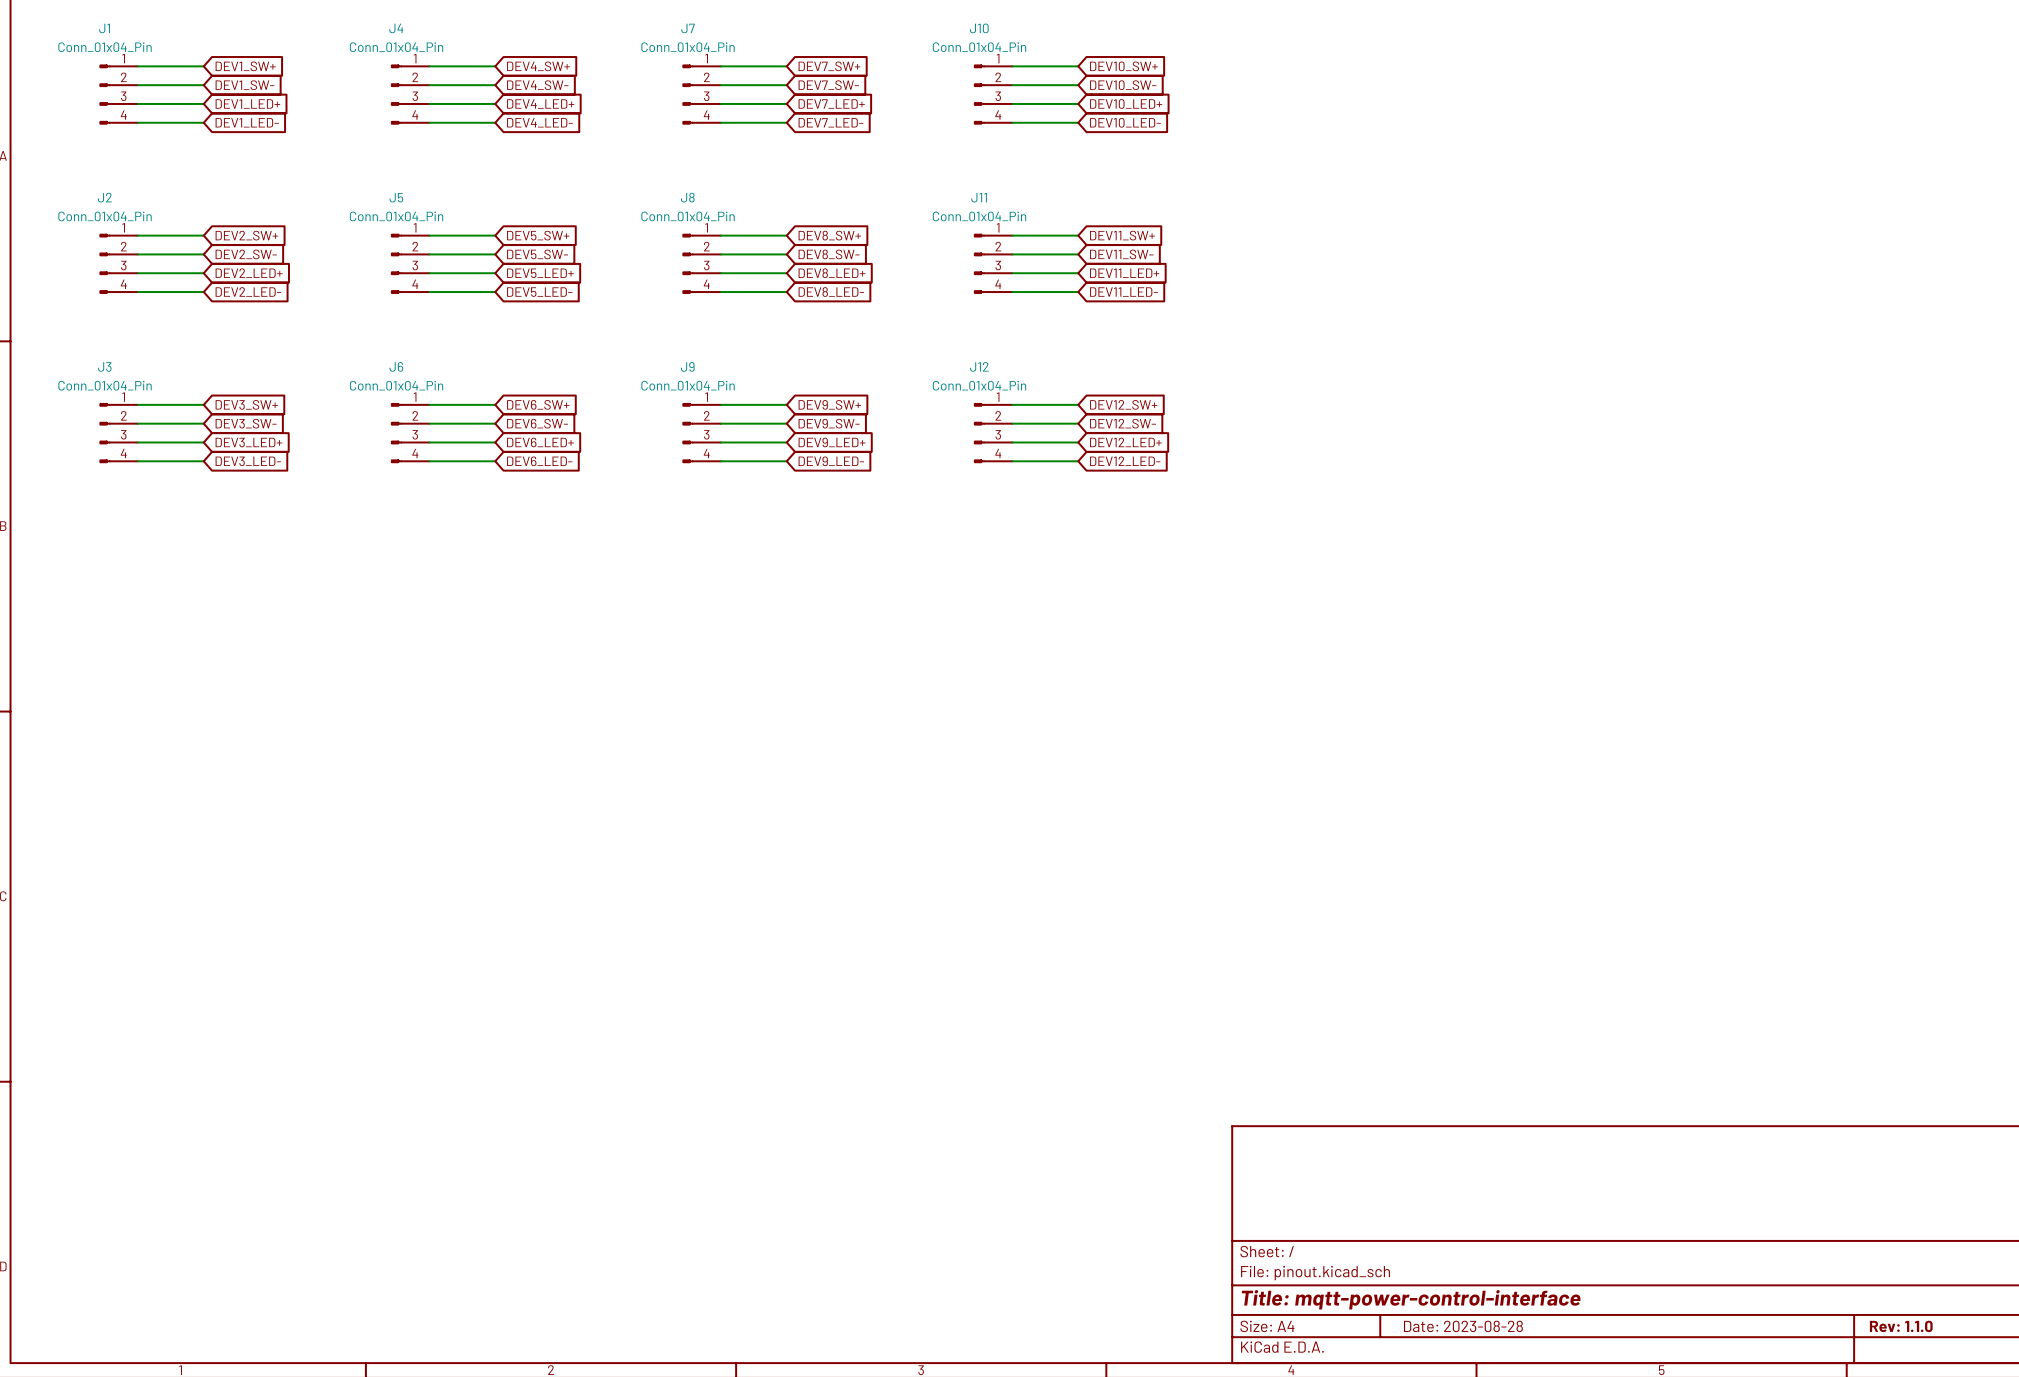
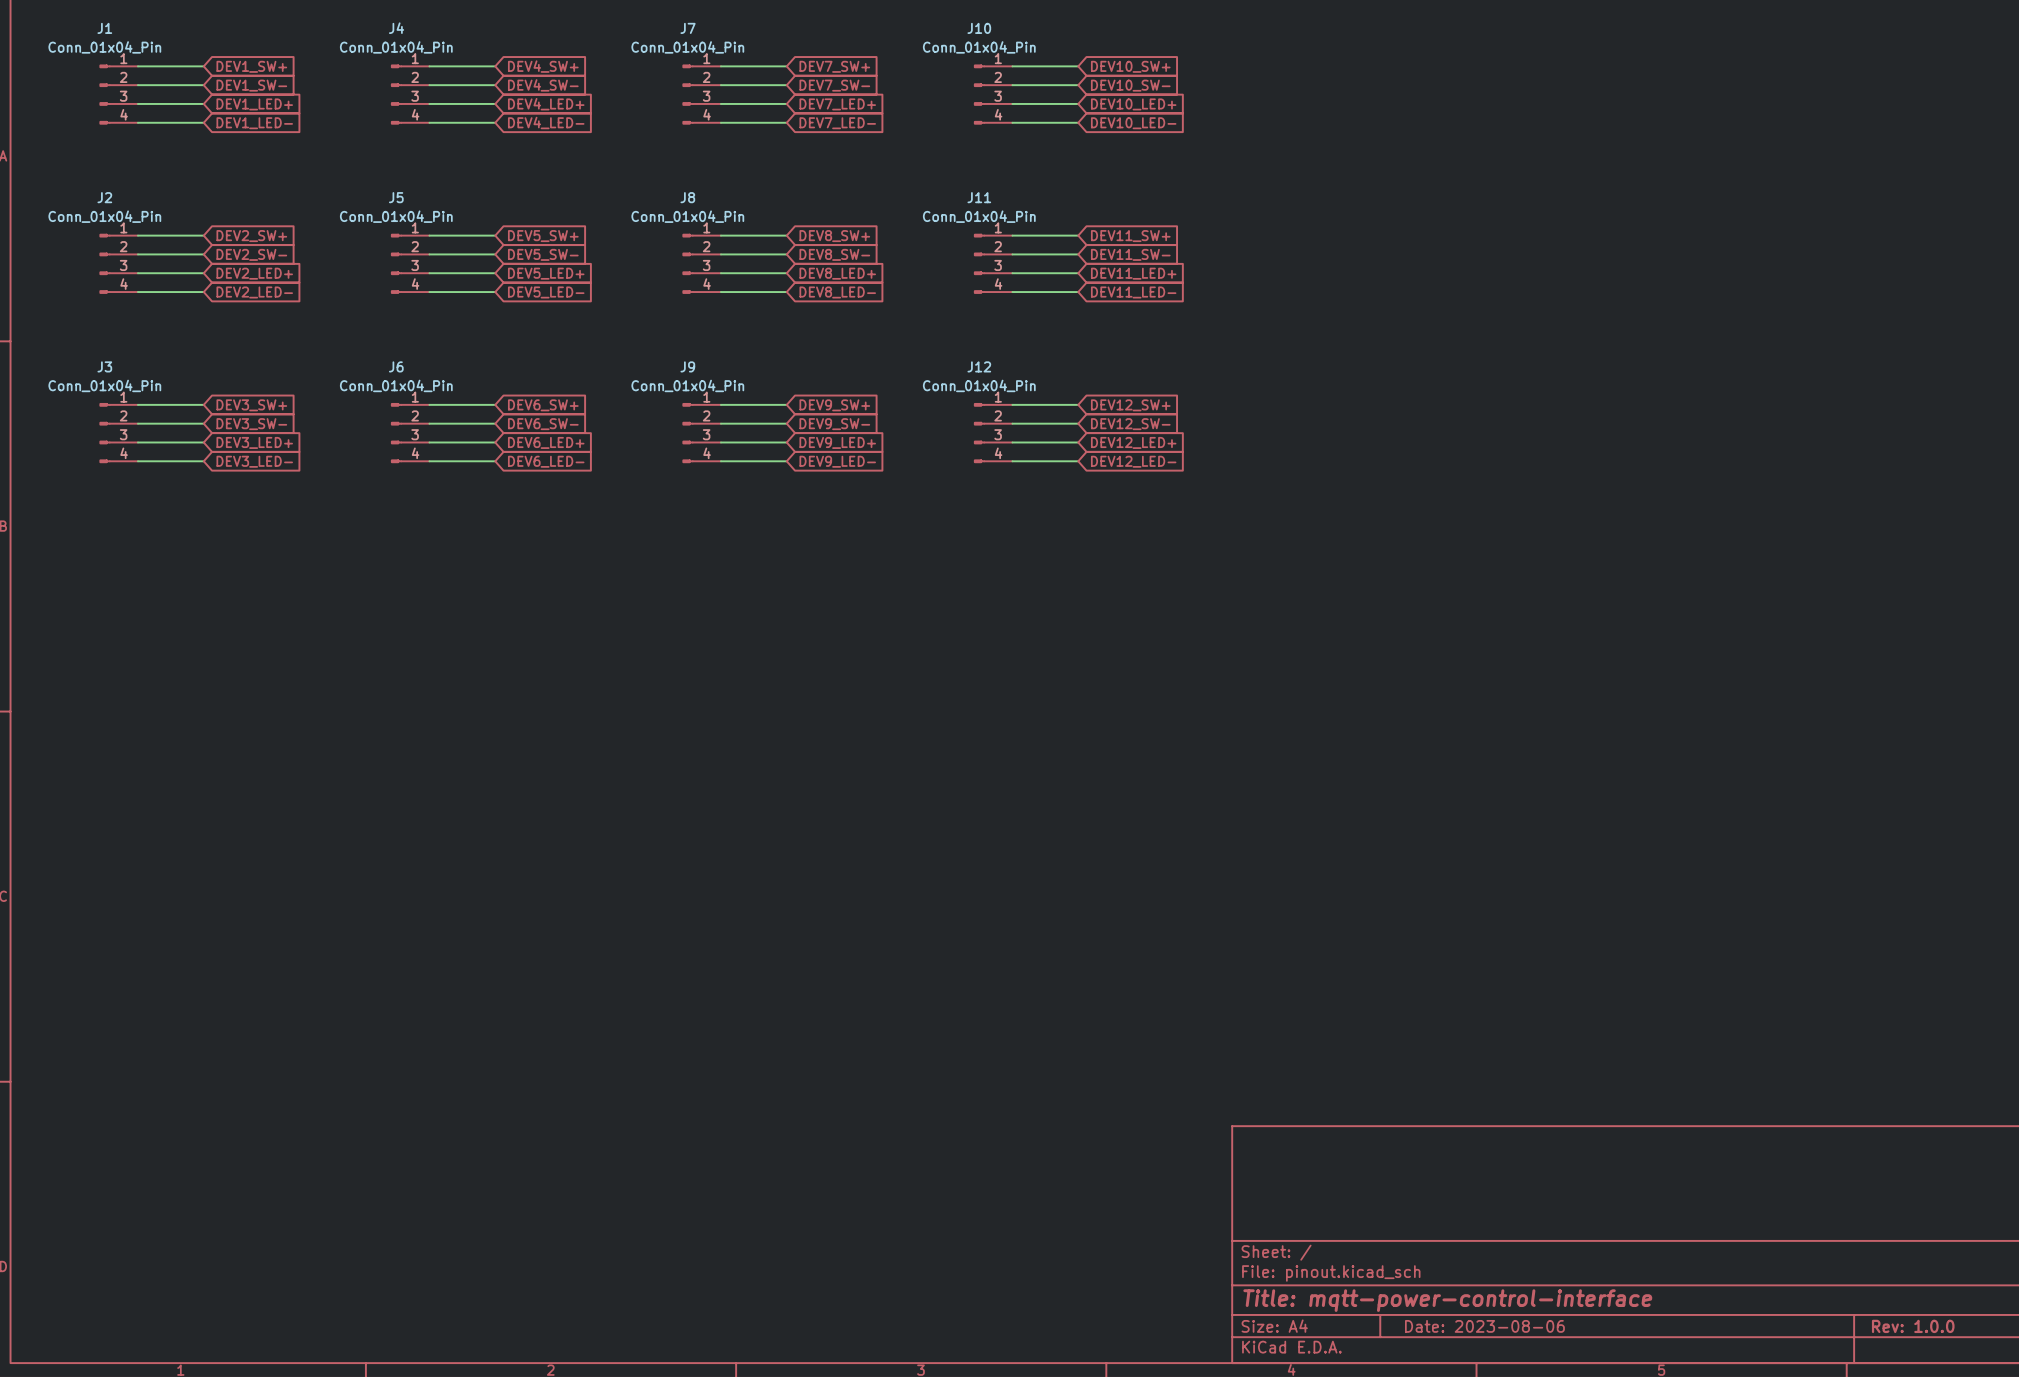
title block: Date: 2023-08-28 (1463, 1326) -> Date: 2023-08-06 (1484, 1326)
title block: Rev: 1.1.0 (1901, 1326) -> Rev: 1.0.0 (1913, 1326)

